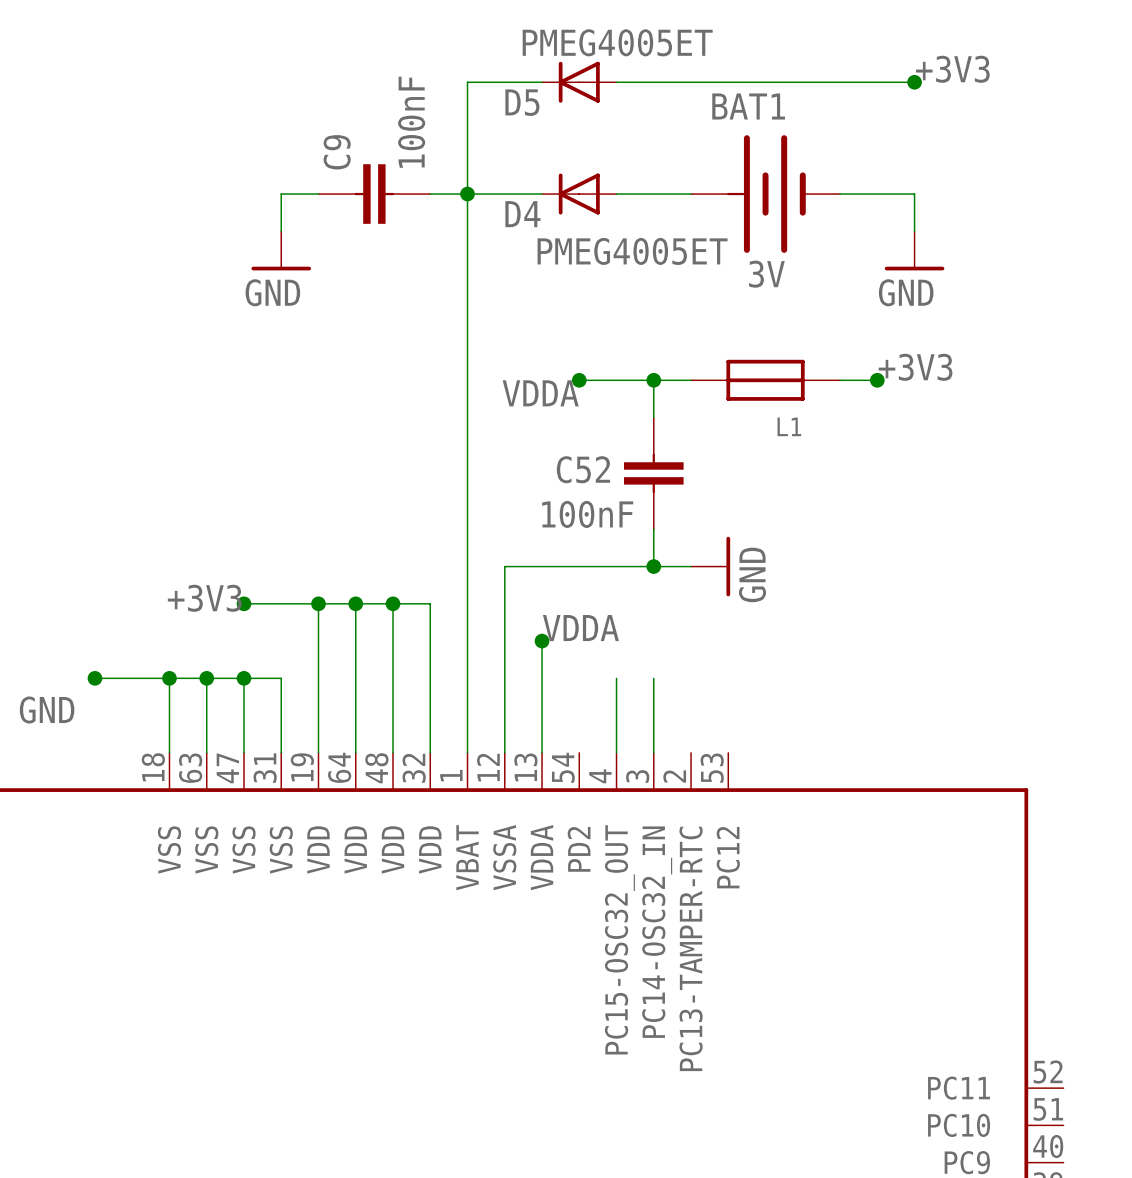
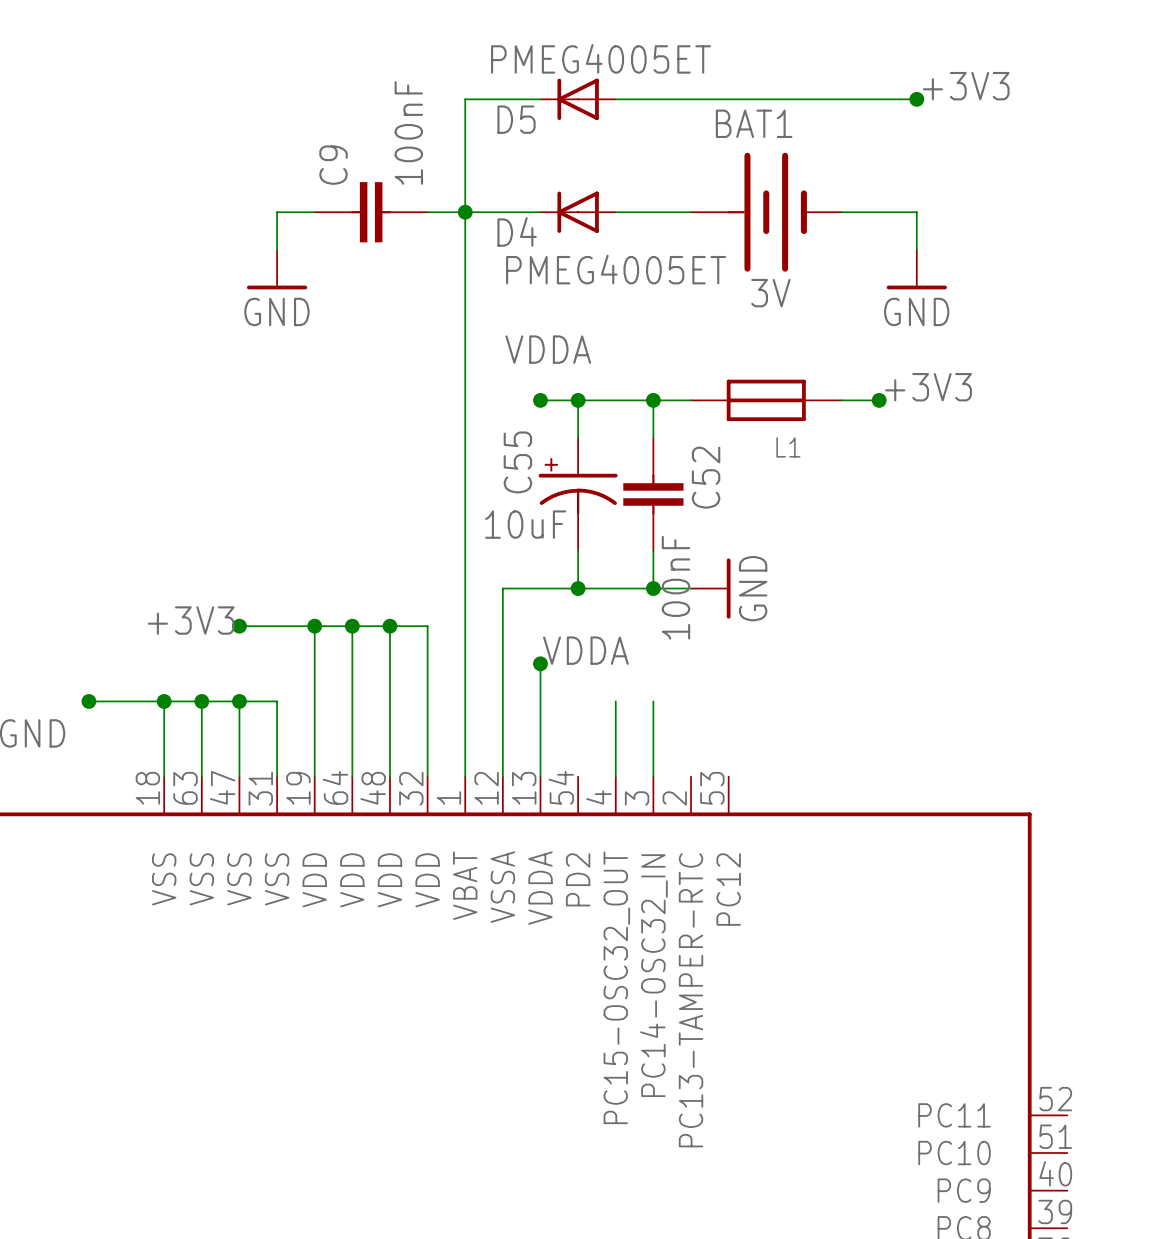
wire: none -> (540, 400) (578, 400) (578, 438)
junction: none -> (540, 400)
label position: VDDA (540, 393) -> VDDA (548, 349)
C52 name rotation: 0° (583, 469) -> 90° counterclockwise (706, 477)
C52 name position: C52 (583, 469) -> C52 (706, 477)
C55: none -> 10uF (578, 494)
C52 value rotation: 0° (587, 514) -> 90° counterclockwise (675, 587)
wire: none -> (578, 550) (578, 588)
junction: none -> (578, 588)

